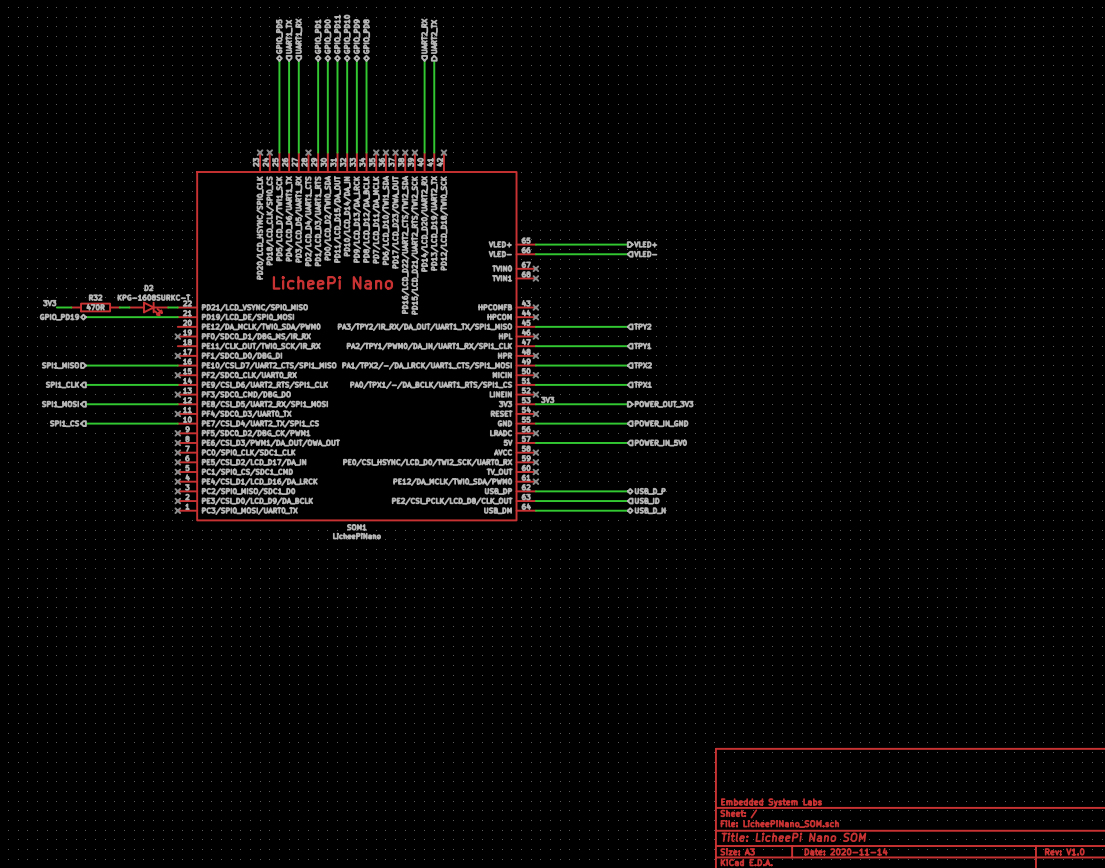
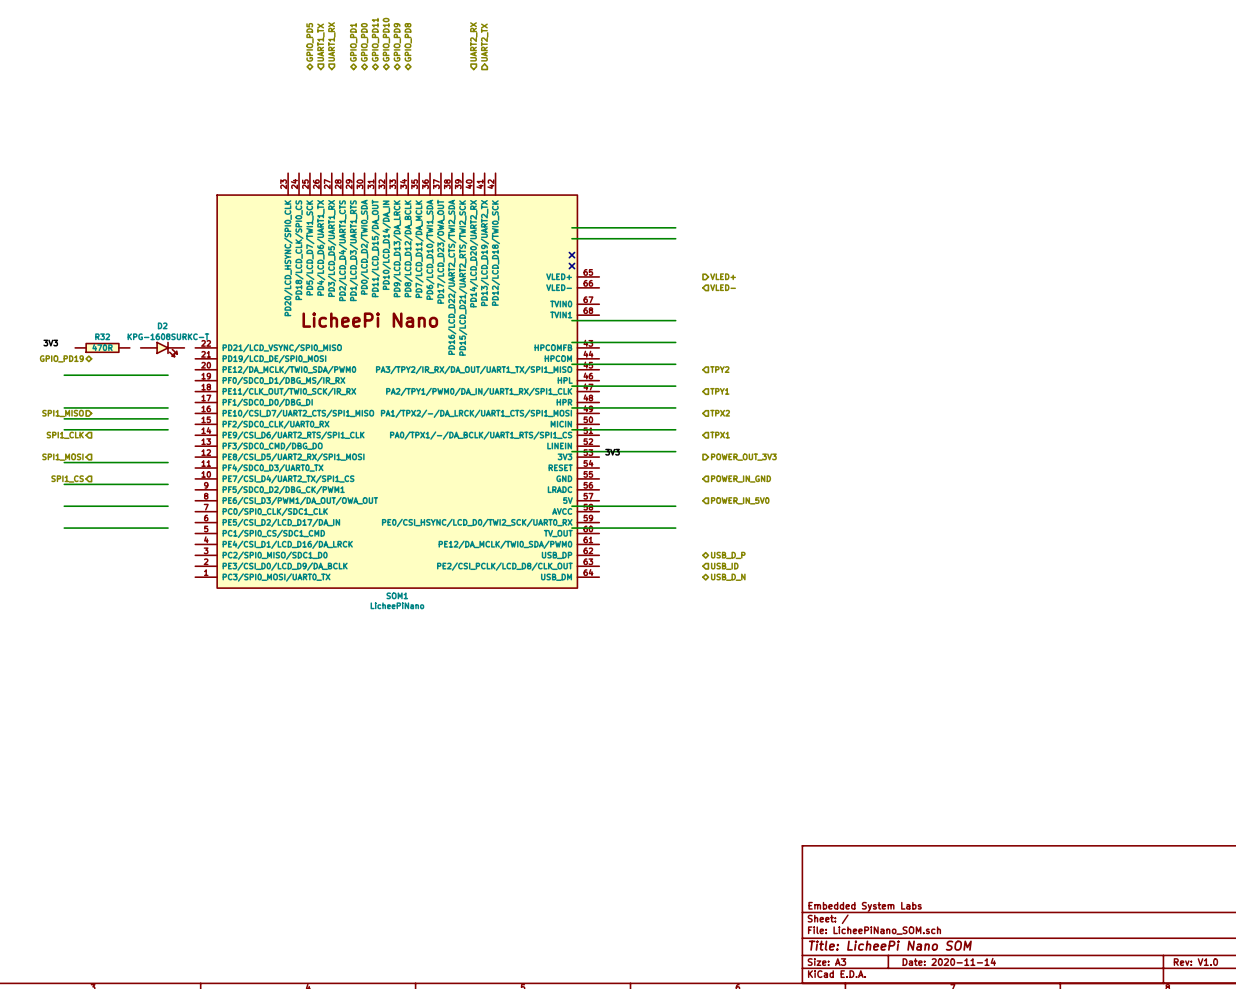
wire: (279, 60) (279, 152) -> none
wire: (289, 60) (289, 152) -> none
wire: (298, 60) (298, 152) -> none
wire: (318, 60) (318, 152) -> none
wire: (327, 60) (327, 152) -> none
wire: (337, 60) (337, 152) -> none
wire: (347, 60) (347, 152) -> none
wire: (356, 60) (356, 152) -> none
wire: (366, 60) (366, 152) -> none
wire: (424, 60) (424, 152) -> none
wire: (434, 60) (434, 152) -> none
no-connect mark: (260, 152) -> none
no-connect mark: (269, 152) -> none
no-connect mark: (308, 152) -> none
no-connect mark: (376, 152) -> none
no-connect mark: (385, 152) -> none
no-connect mark: (395, 152) -> none
no-connect mark: (405, 152) -> none
no-connect mark: (414, 152) -> none
no-connect mark: (443, 152) -> none
no-connect mark: none -> (571, 255)
no-connect mark: none -> (571, 266)
wire: (535, 244) (627, 244) -> (571, 227) (675, 227)
wire: (535, 254) (627, 254) -> (571, 238) (675, 238)
no-connect mark: (535, 268) -> none
no-connect mark: (535, 278) -> none
wire: (56, 307) (71, 307) -> none
wire: (119, 307) (129, 307) -> none
wire: (168, 307) (177, 307) -> none
no-connect mark: (535, 307) -> none
wire: (85, 317) (177, 317) -> (64, 375) (168, 375)
no-connect mark: (535, 317) -> none
wire: (535, 326) (627, 326) -> (571, 320) (675, 320)
no-connect mark: (177, 336) -> none
no-connect mark: (535, 336) -> none
wire: (535, 346) (627, 346) -> (571, 342) (675, 342)
no-connect mark: (177, 355) -> none
no-connect mark: (535, 355) -> none
wire: (85, 365) (177, 365) -> (64, 462) (168, 462)
wire: (535, 365) (627, 365) -> (571, 364) (675, 364)
wire: none -> (64, 418) (168, 418)
no-connect mark: (177, 375) -> none
no-connect mark: (535, 375) -> none
wire: (85, 384) (177, 384) -> (64, 484) (168, 484)
wire: (535, 384) (627, 384) -> (571, 386) (675, 386)
no-connect mark: (177, 394) -> none
no-connect mark: (535, 394) -> none
wire: (85, 404) (177, 404) -> (64, 407) (168, 407)
wire: (535, 404) (627, 404) -> (571, 407) (675, 407)
no-connect mark: (177, 413) -> none
no-connect mark: (535, 413) -> none
wire: (85, 423) (177, 423) -> (64, 429) (168, 429)
wire: (535, 423) (627, 423) -> (571, 429) (675, 429)
no-connect mark: (177, 433) -> none
no-connect mark: (535, 433) -> none
no-connect mark: (177, 442) -> none
wire: (535, 442) (627, 442) -> (571, 451) (675, 451)
wire: none -> (64, 506) (168, 506)
no-connect mark: (177, 452) -> none
no-connect mark: (535, 452) -> none
no-connect mark: (177, 462) -> none
no-connect mark: (535, 462) -> none
wire: none -> (64, 528) (168, 528)
no-connect mark: (177, 472) -> none
no-connect mark: (535, 472) -> none
no-connect mark: (177, 481) -> none
no-connect mark: (535, 481) -> none
no-connect mark: (177, 491) -> none
wire: (535, 491) (627, 491) -> (571, 506) (675, 506)
no-connect mark: (177, 501) -> none
wire: (535, 501) (627, 501) -> none
no-connect mark: (177, 510) -> none
wire: (535, 510) (627, 510) -> (571, 528) (675, 528)

